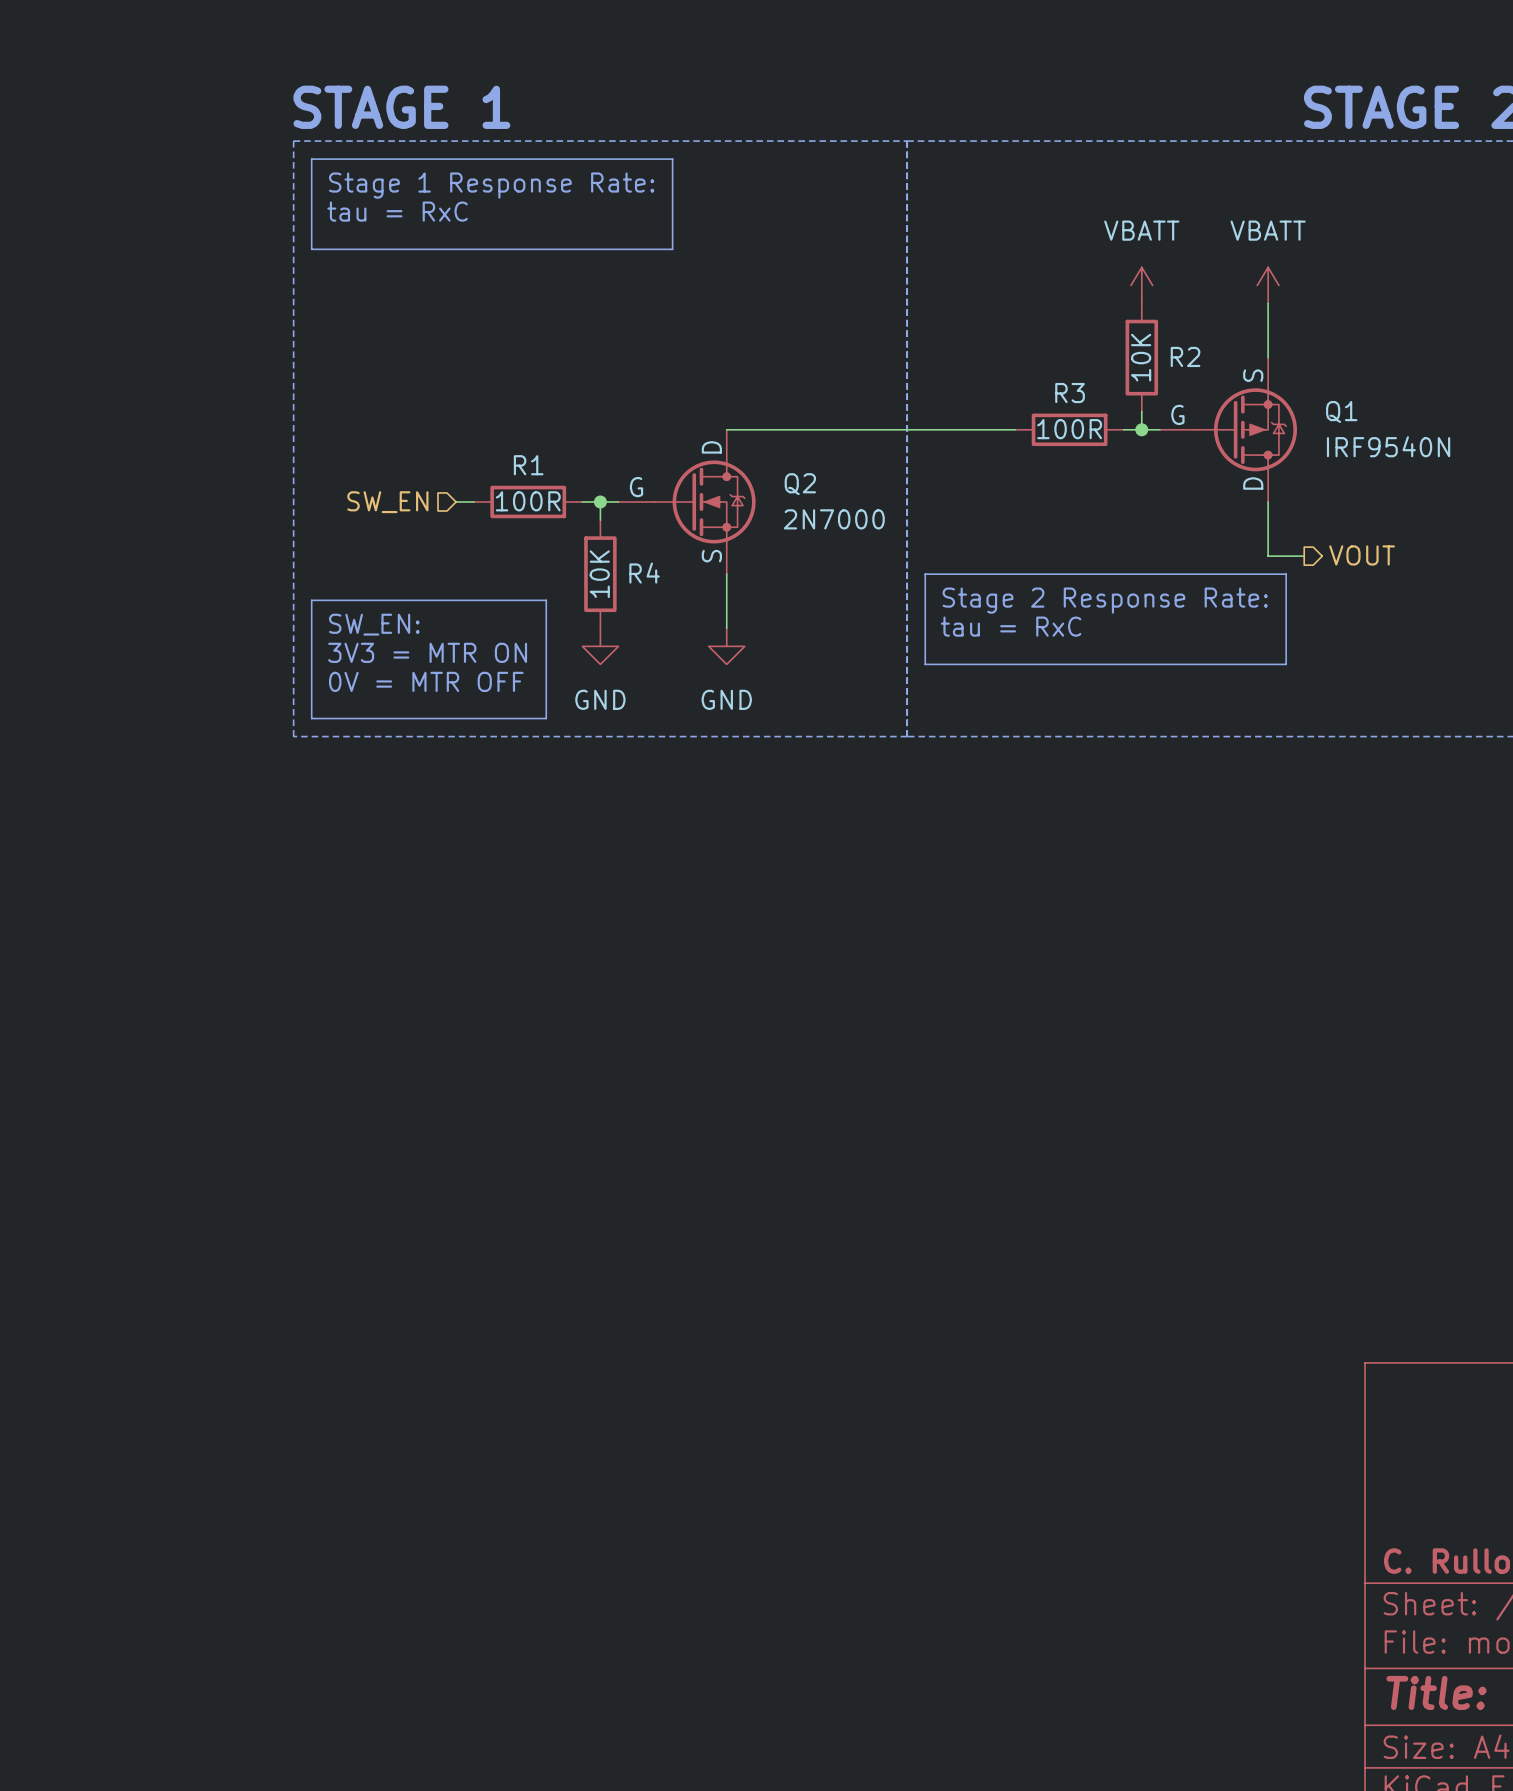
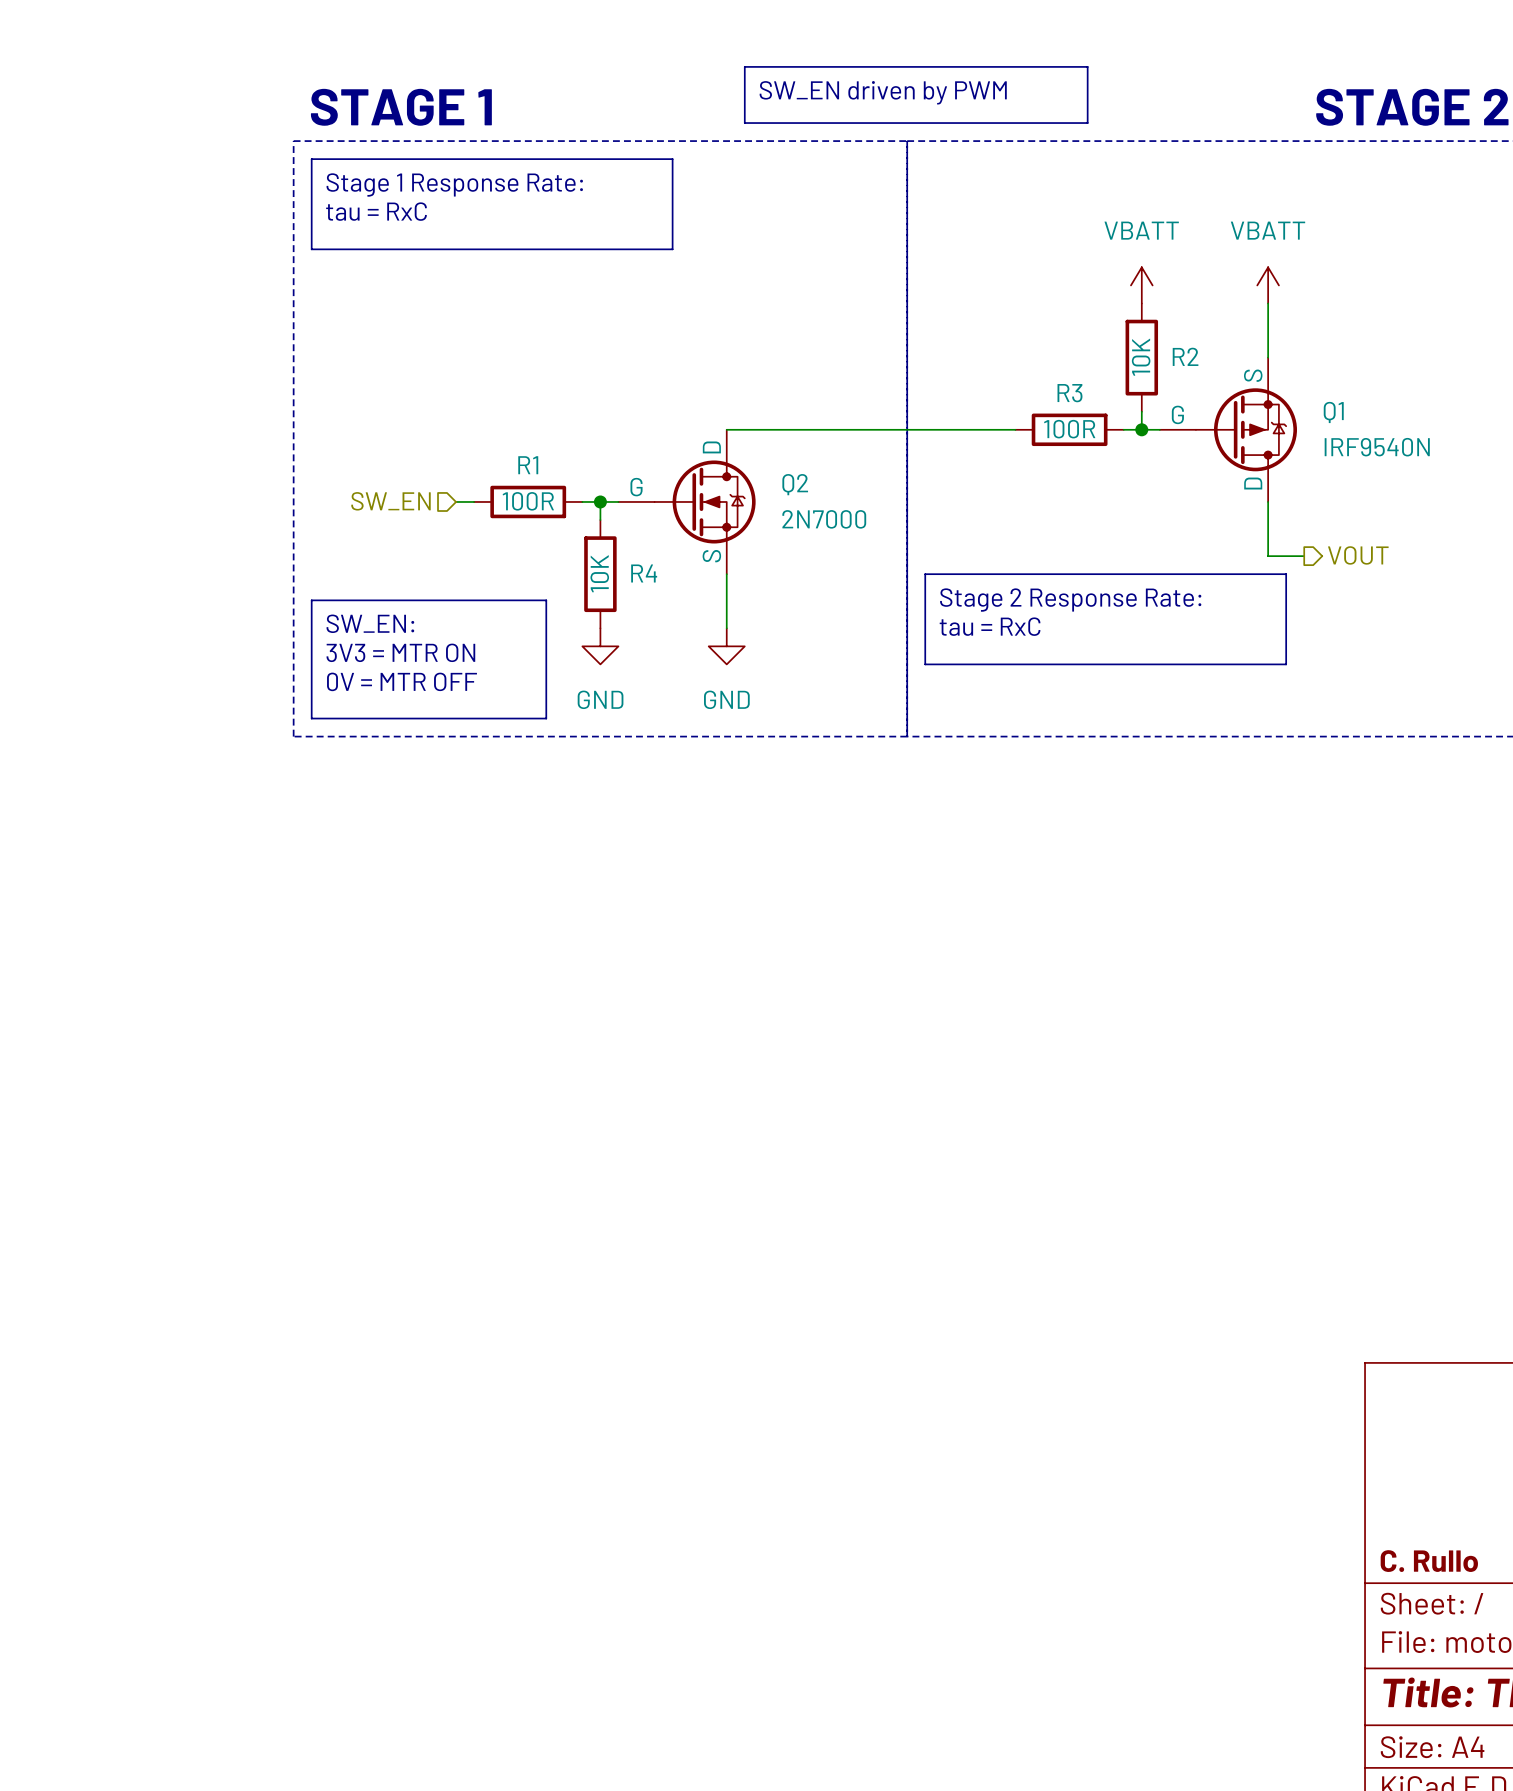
line: none -> (744, 66) (1087, 66) (1087, 123) (744, 123) (744, 66)
text: none -> SW_EN driven by PWM (883, 92)

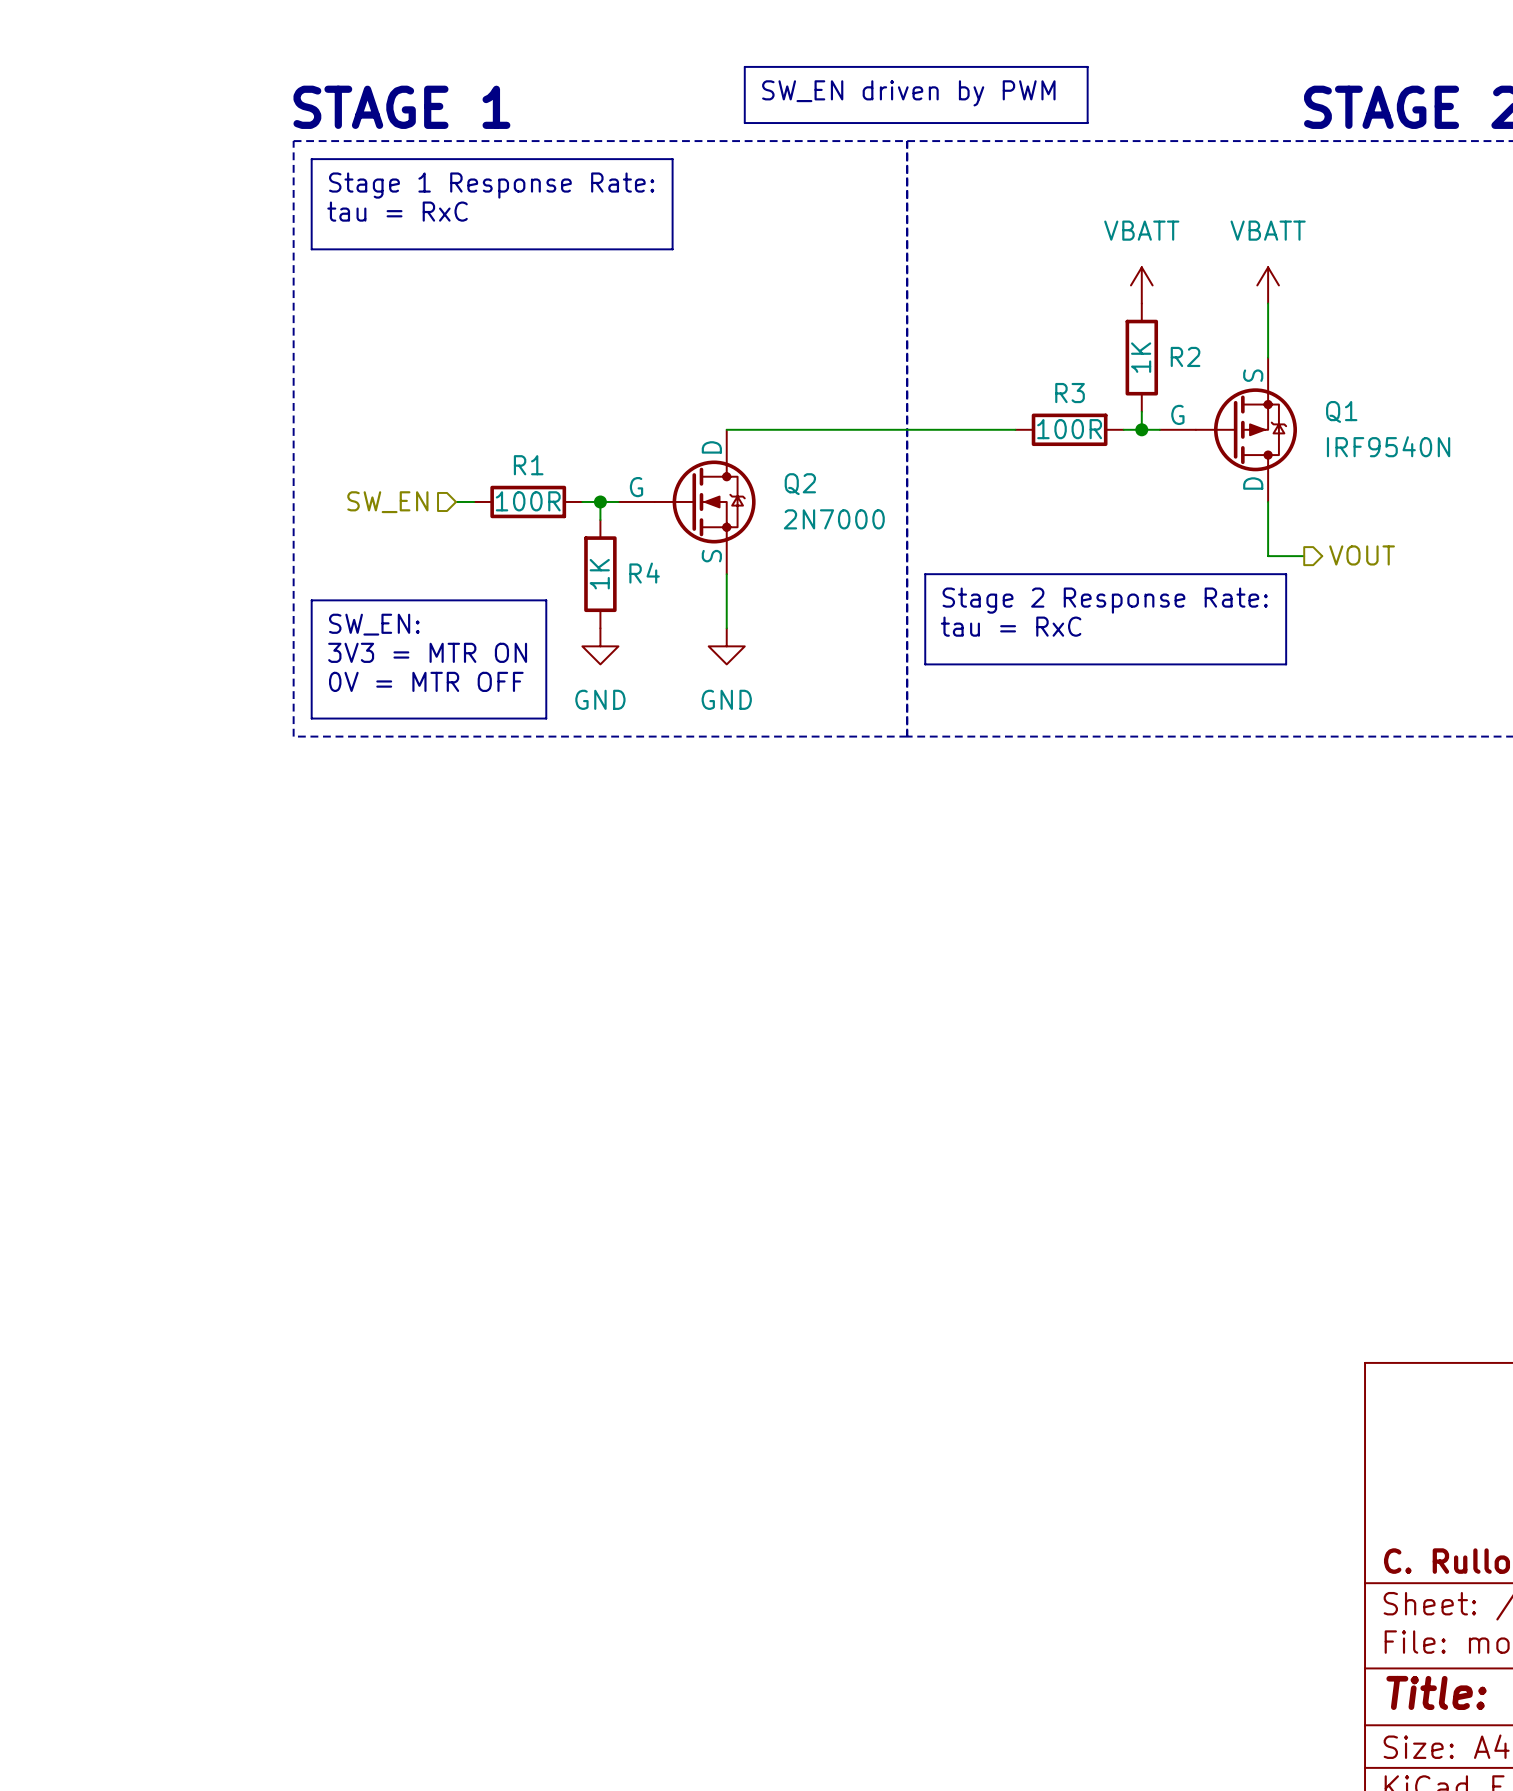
R2 value: 10K (1141, 357) -> 1K (1141, 357)
R4 value: 10K (599, 573) -> 1K (599, 574)

